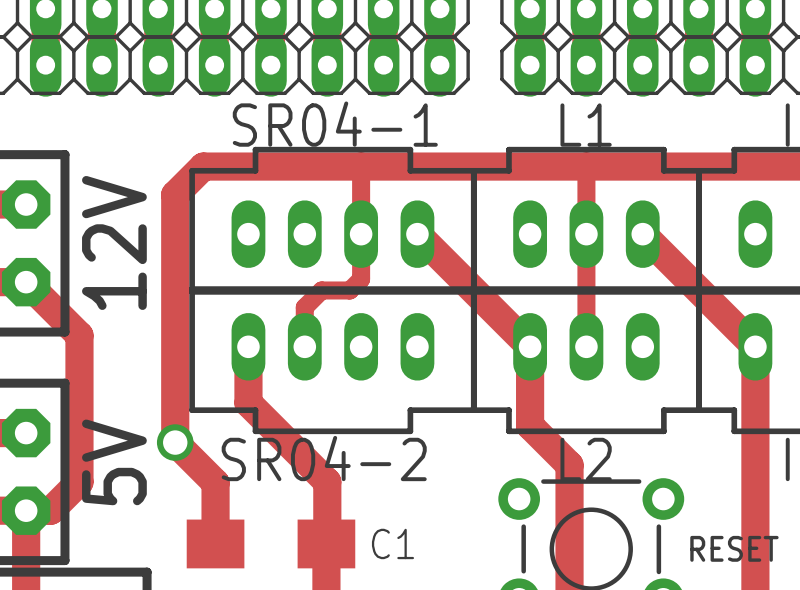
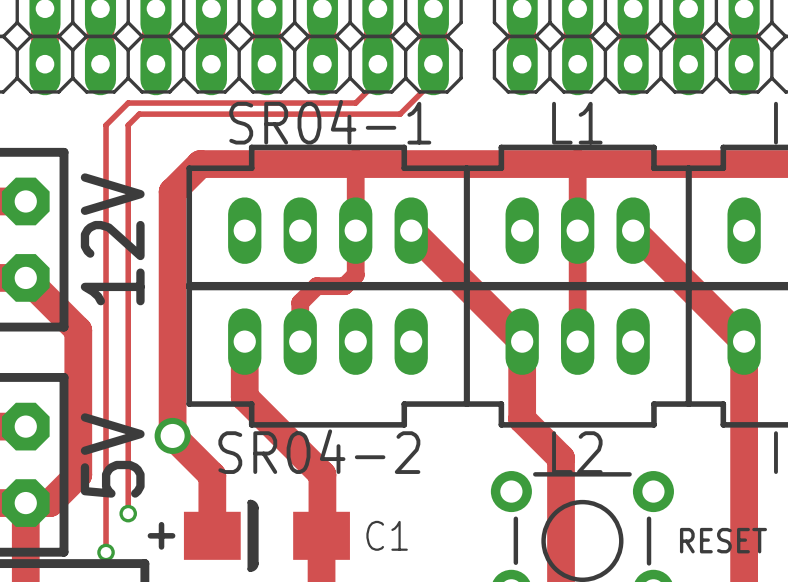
track: none -> (377, 64) (377, 80) (355, 103) (128, 103) (106, 125) (106, 552)
track: none -> (433, 64) (433, 80) (400, 114) (139, 114) (128, 125) (128, 513)
line: none -> (250, 502) (250, 569) (254, 567) (255, 563) (255, 507) (250, 502)
via: none -> (128, 513)
line: none -> (161, 524) (161, 546)
line: none -> (150, 535) (172, 535)
via: none -> (106, 552)

